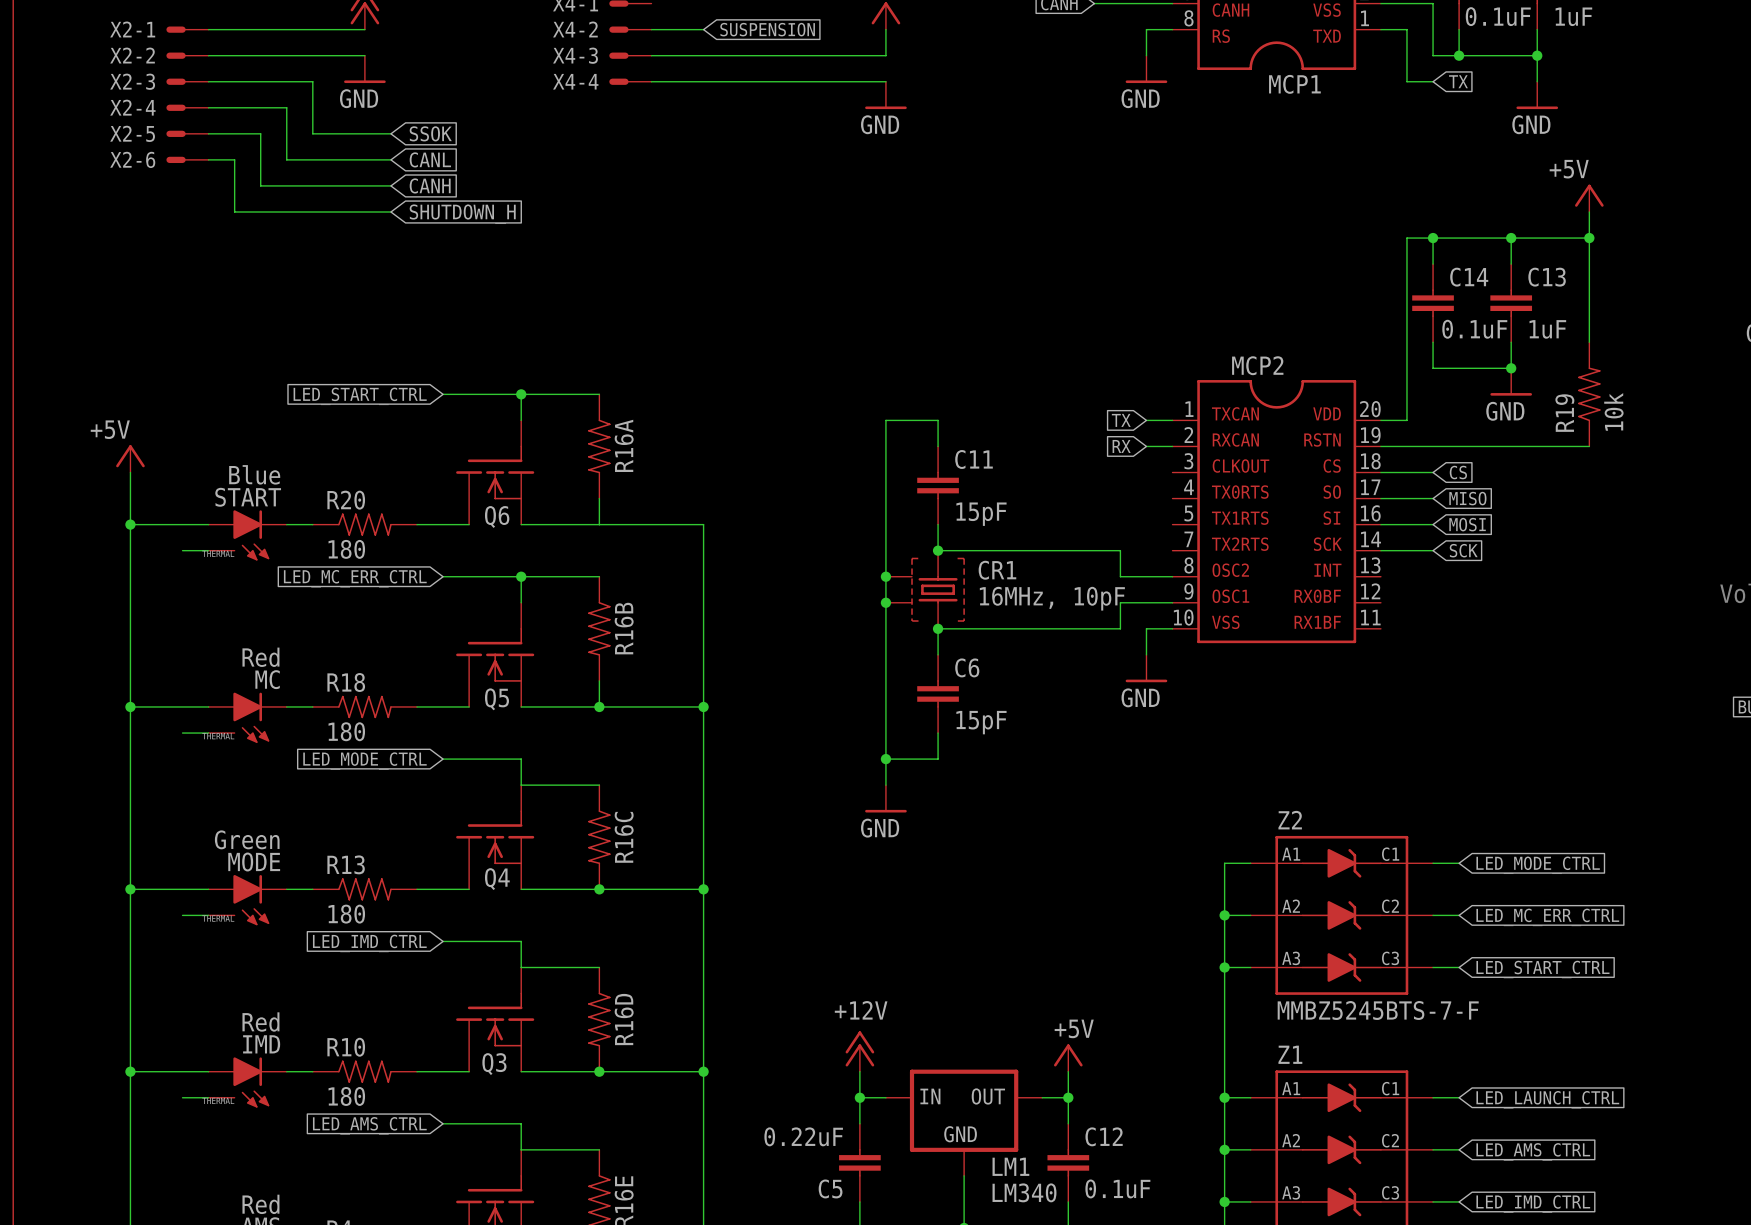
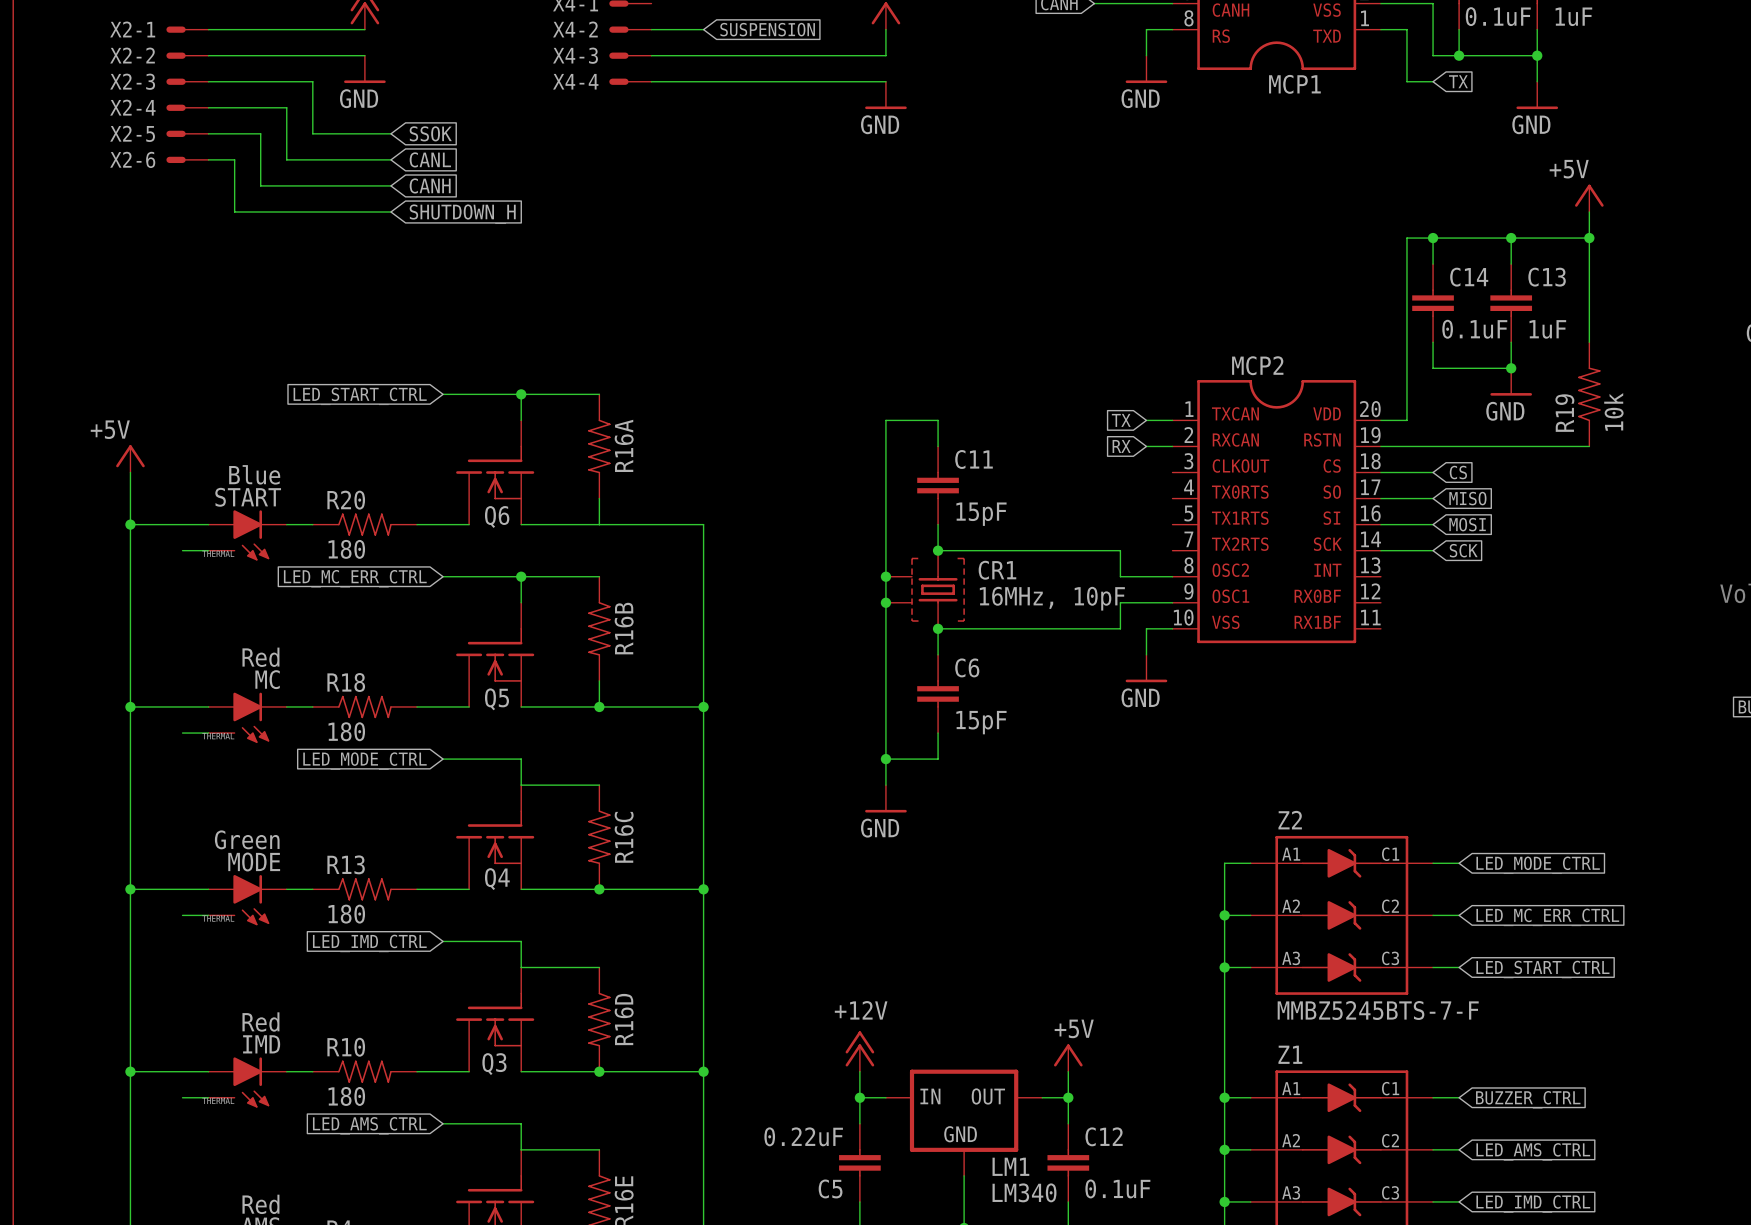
global label: LED_LAUNCH_CTRL (1547, 1099) -> BUZZER_CTRL (1528, 1099)

